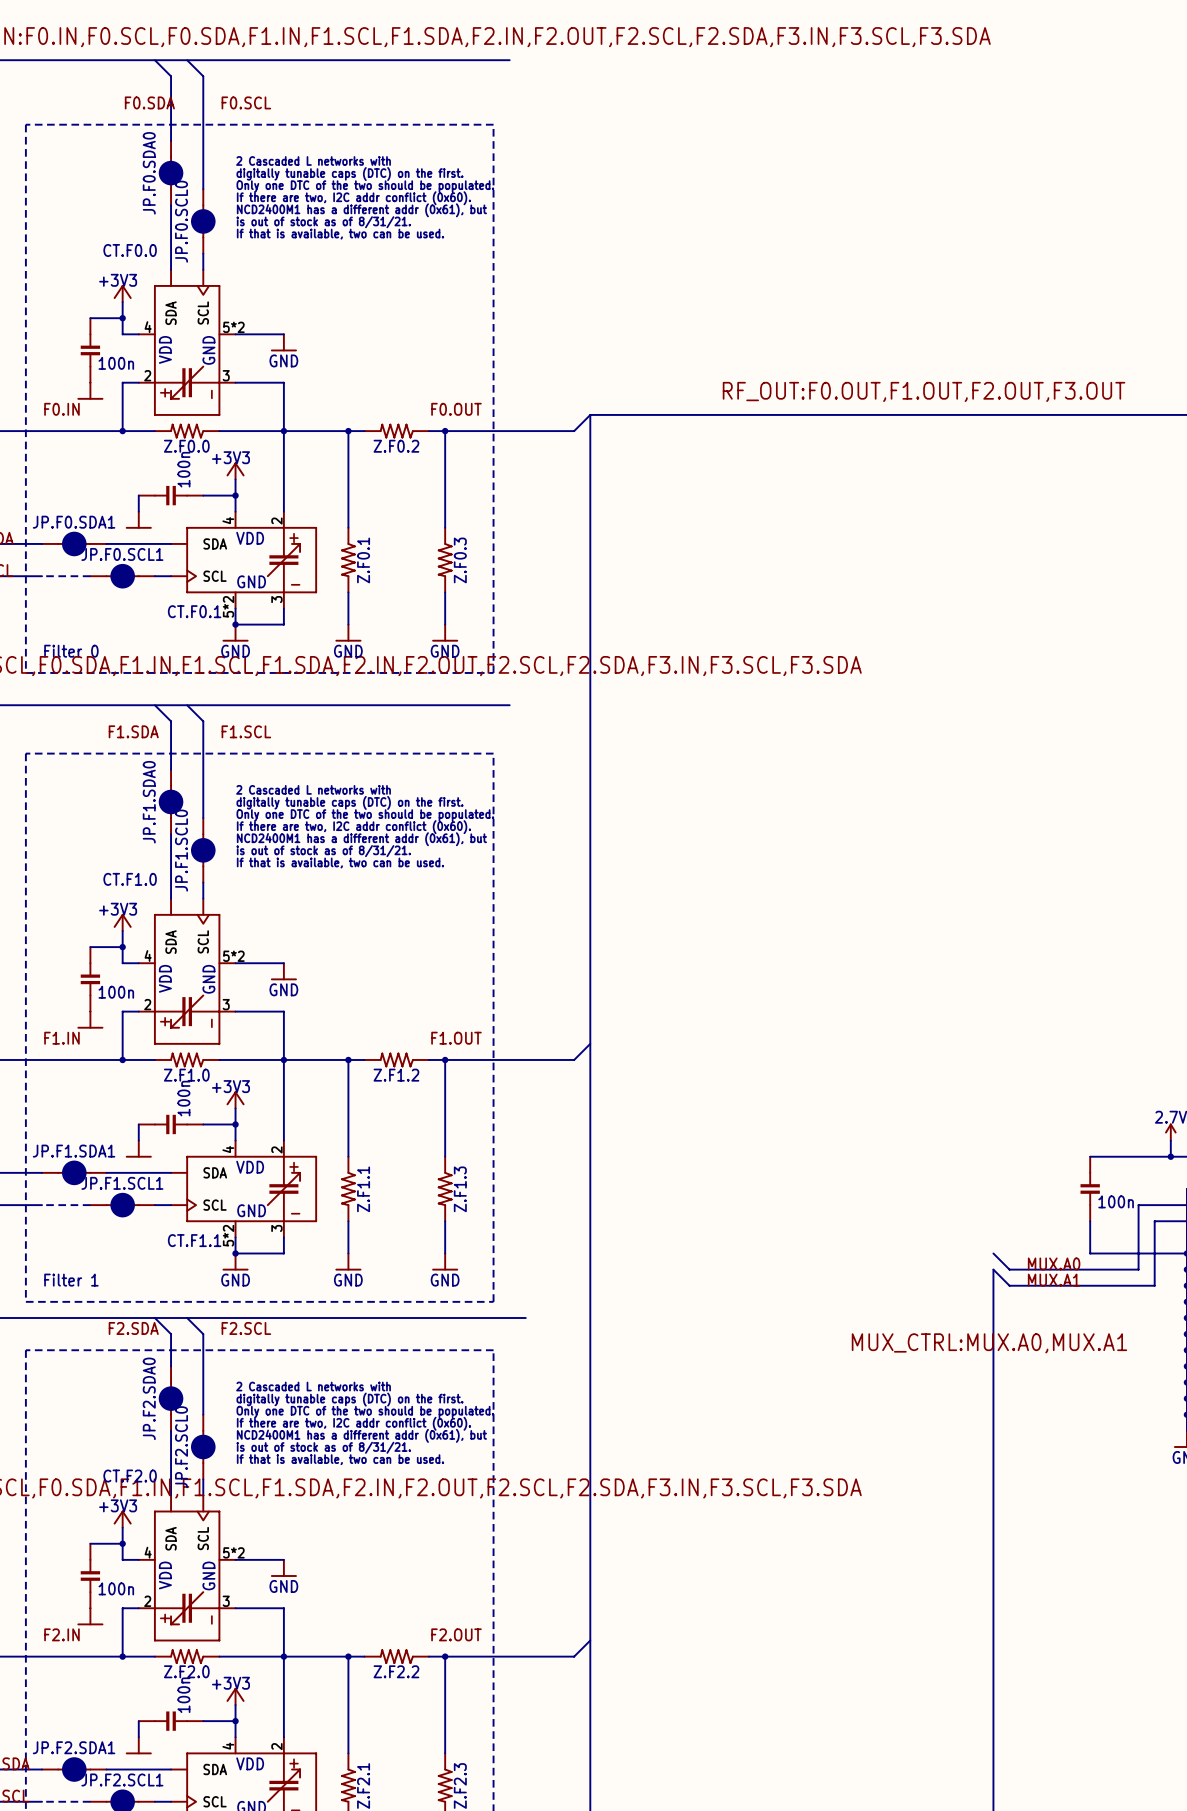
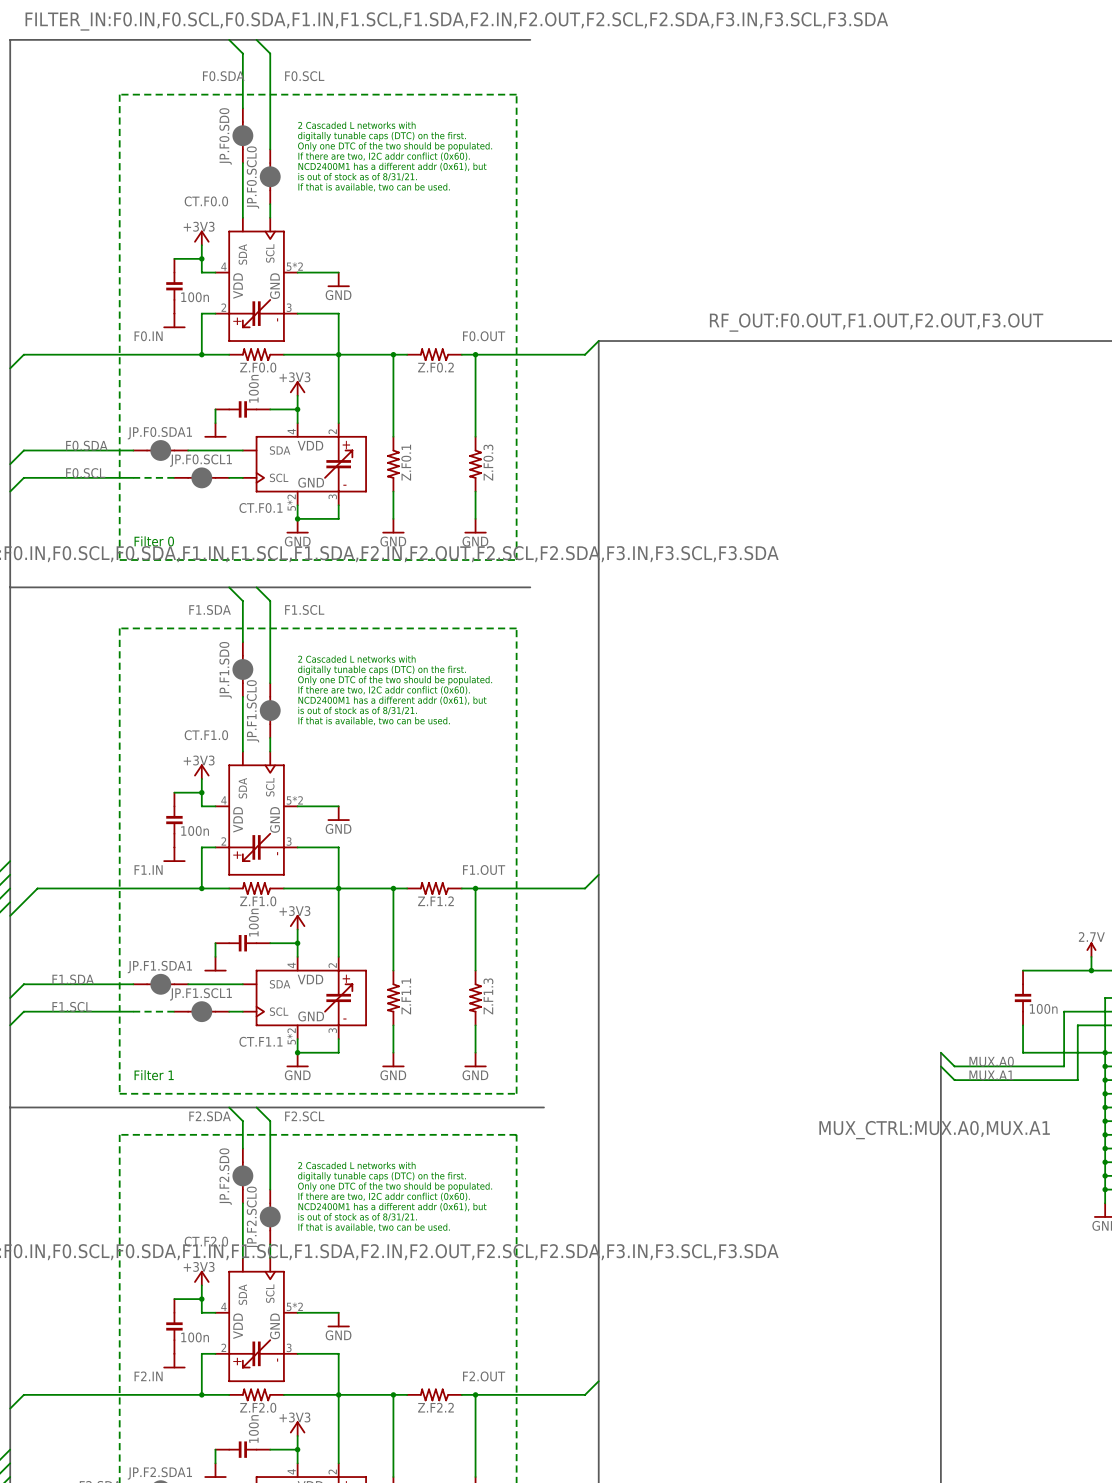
JP.F0.SDA0 name: JP.F0.SDA0 (149, 173) -> JP.F0.SD0 (225, 136)
JP.F1.SDA0 name: JP.F1.SDA0 (149, 802) -> JP.F1.SD0 (225, 670)
bus: none -> (940, 1052) (940, 1066)
JP.F2.SDA0 name: JP.F2.SDA0 (149, 1398) -> JP.F2.SD0 (225, 1176)

